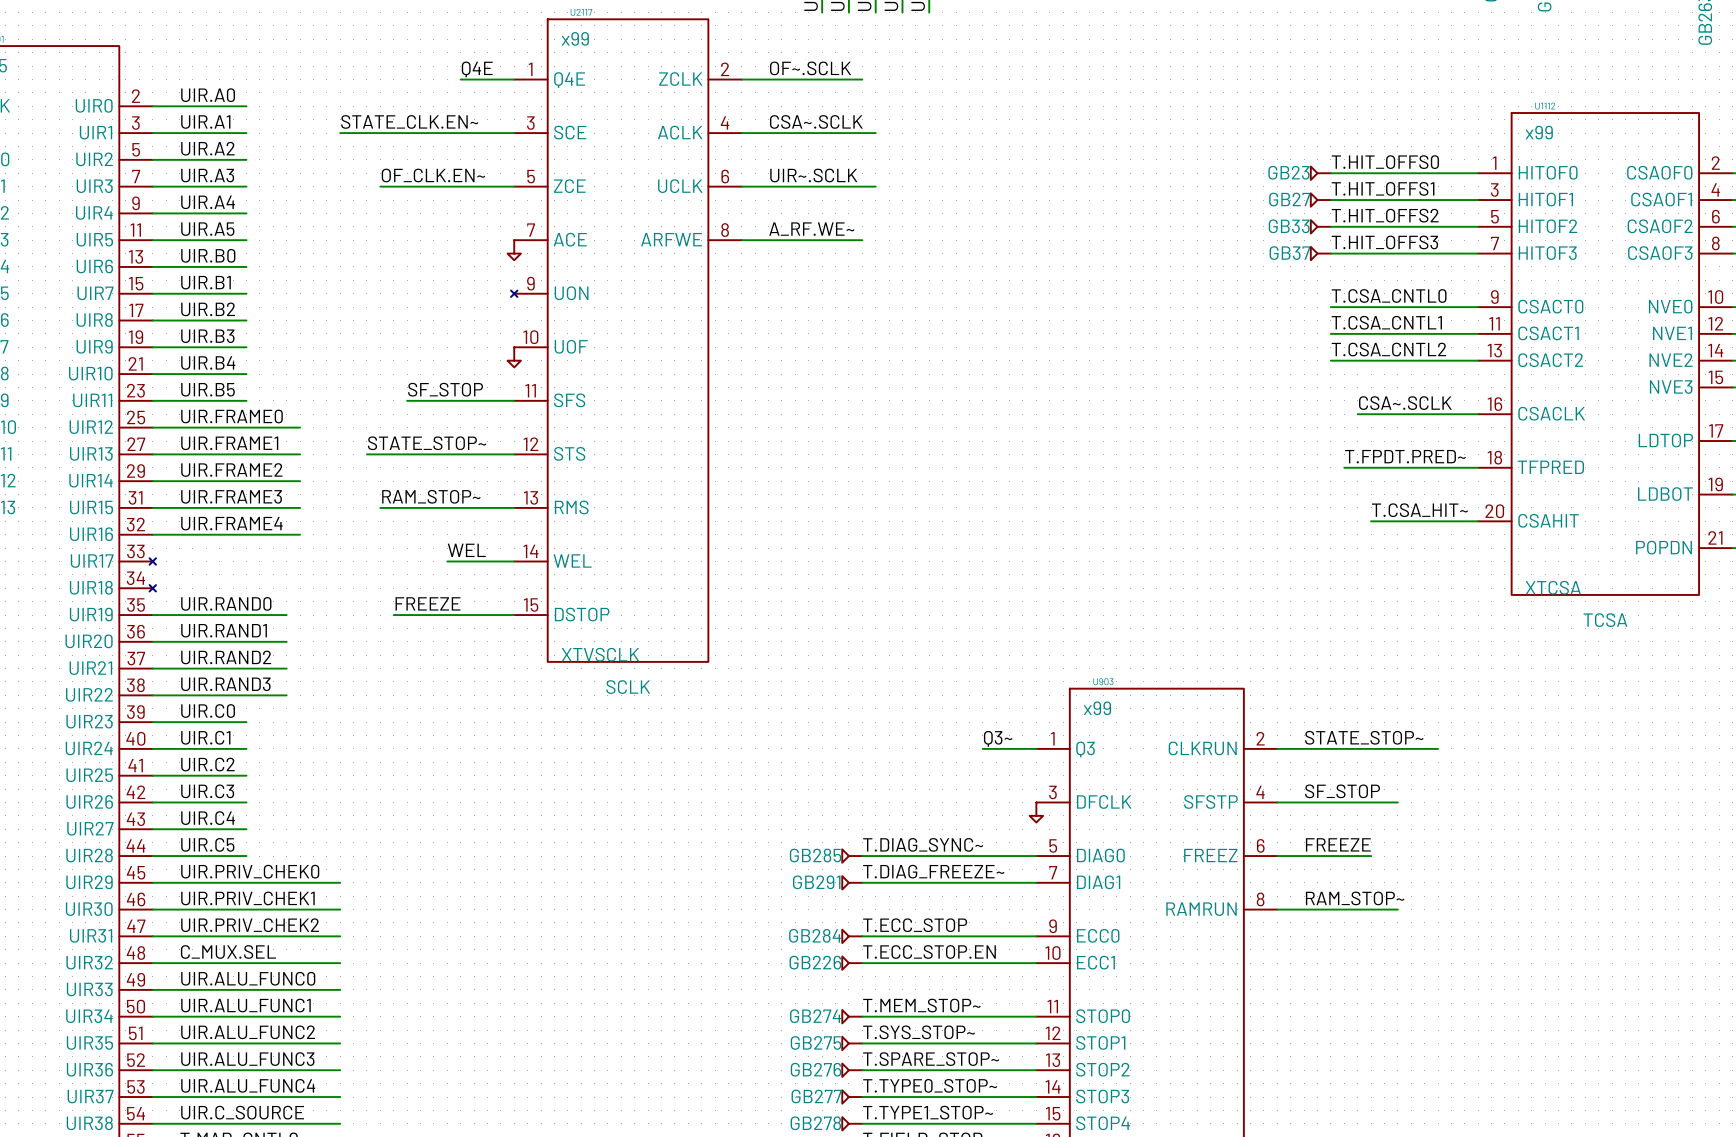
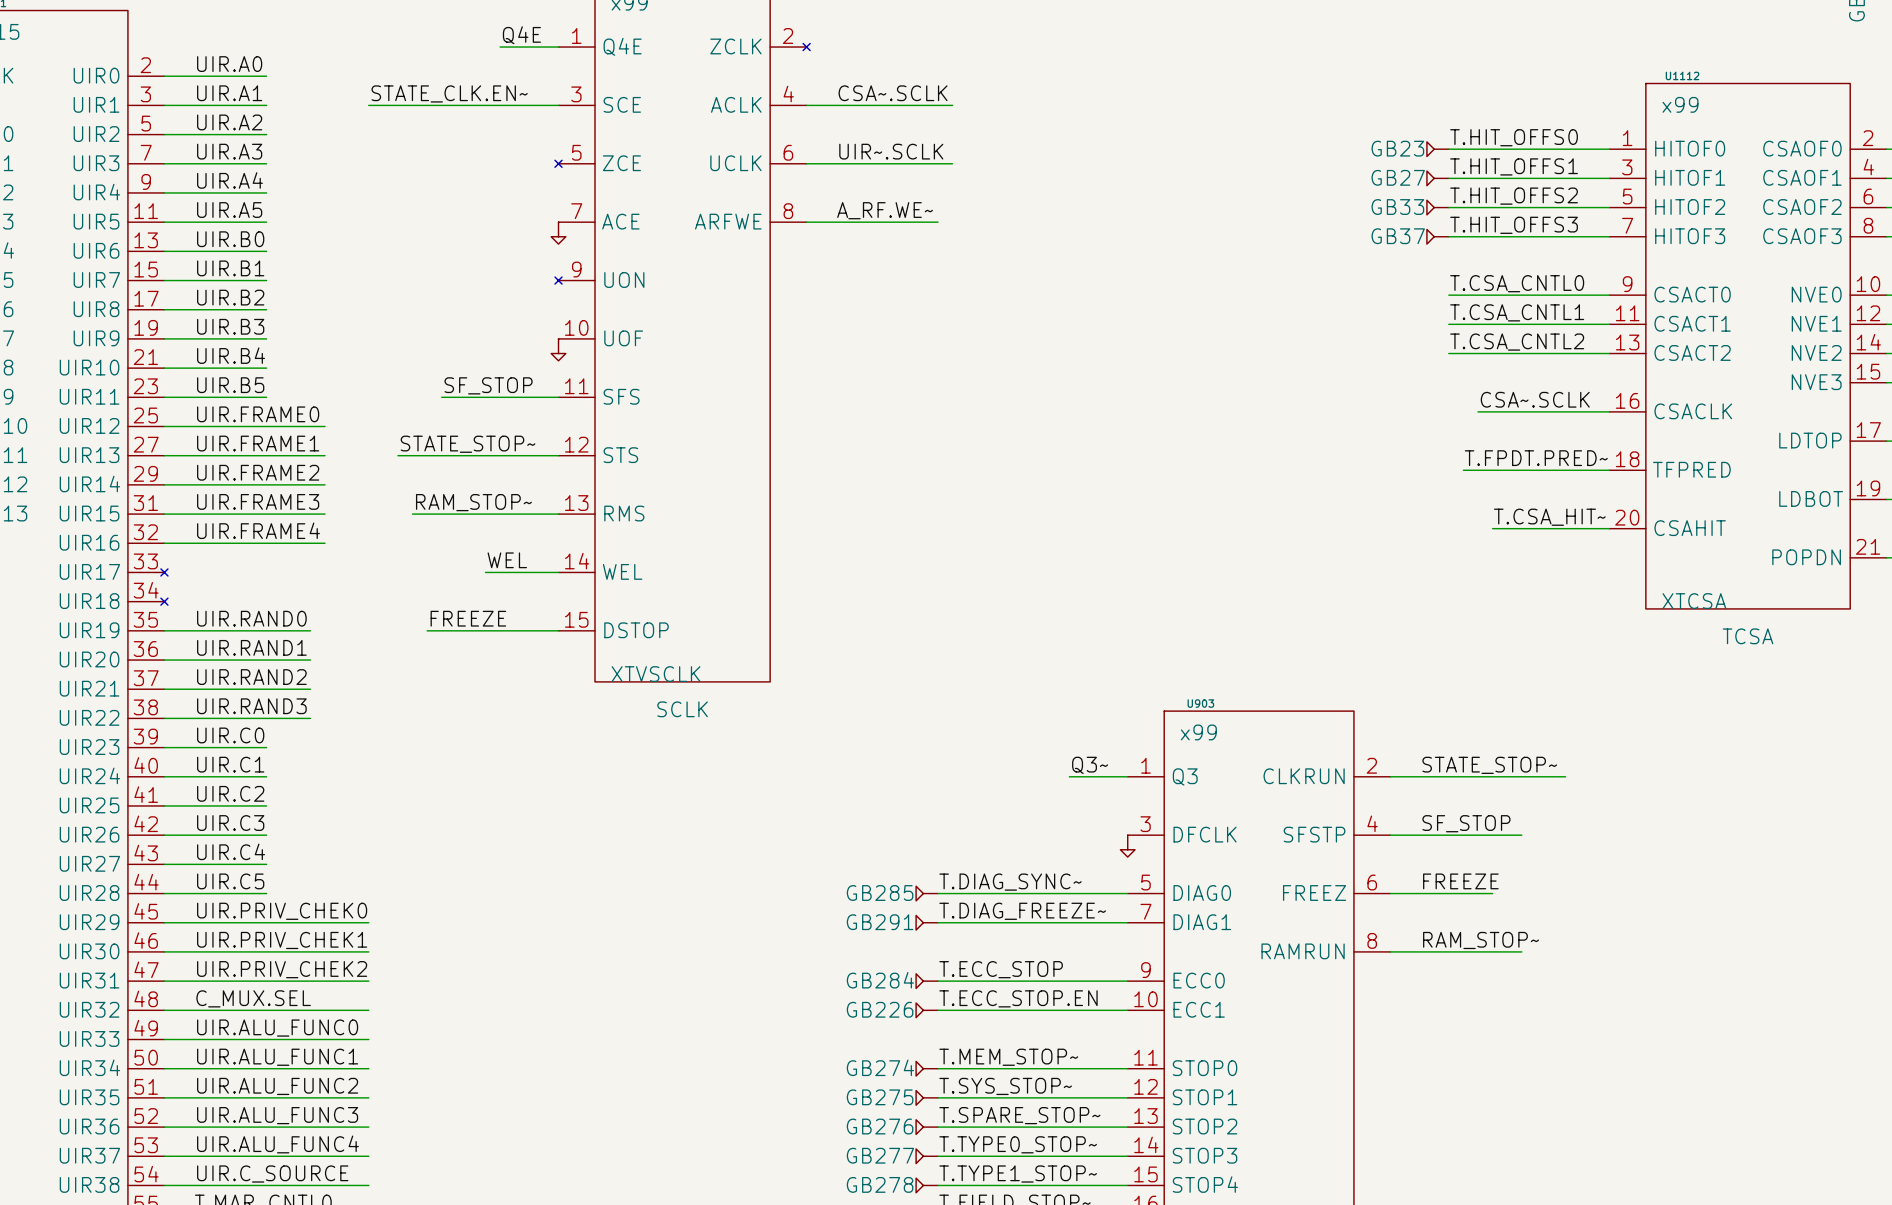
label: OF~.SCLK (810, 68) -> none
wire: (741, 79) (862, 79) -> none
no-connect mark: none -> (806, 47)
label: OF_CLK.EN~ (433, 175) -> none
wire: (380, 186) (514, 186) -> none
no-connect mark: none -> (558, 163)

